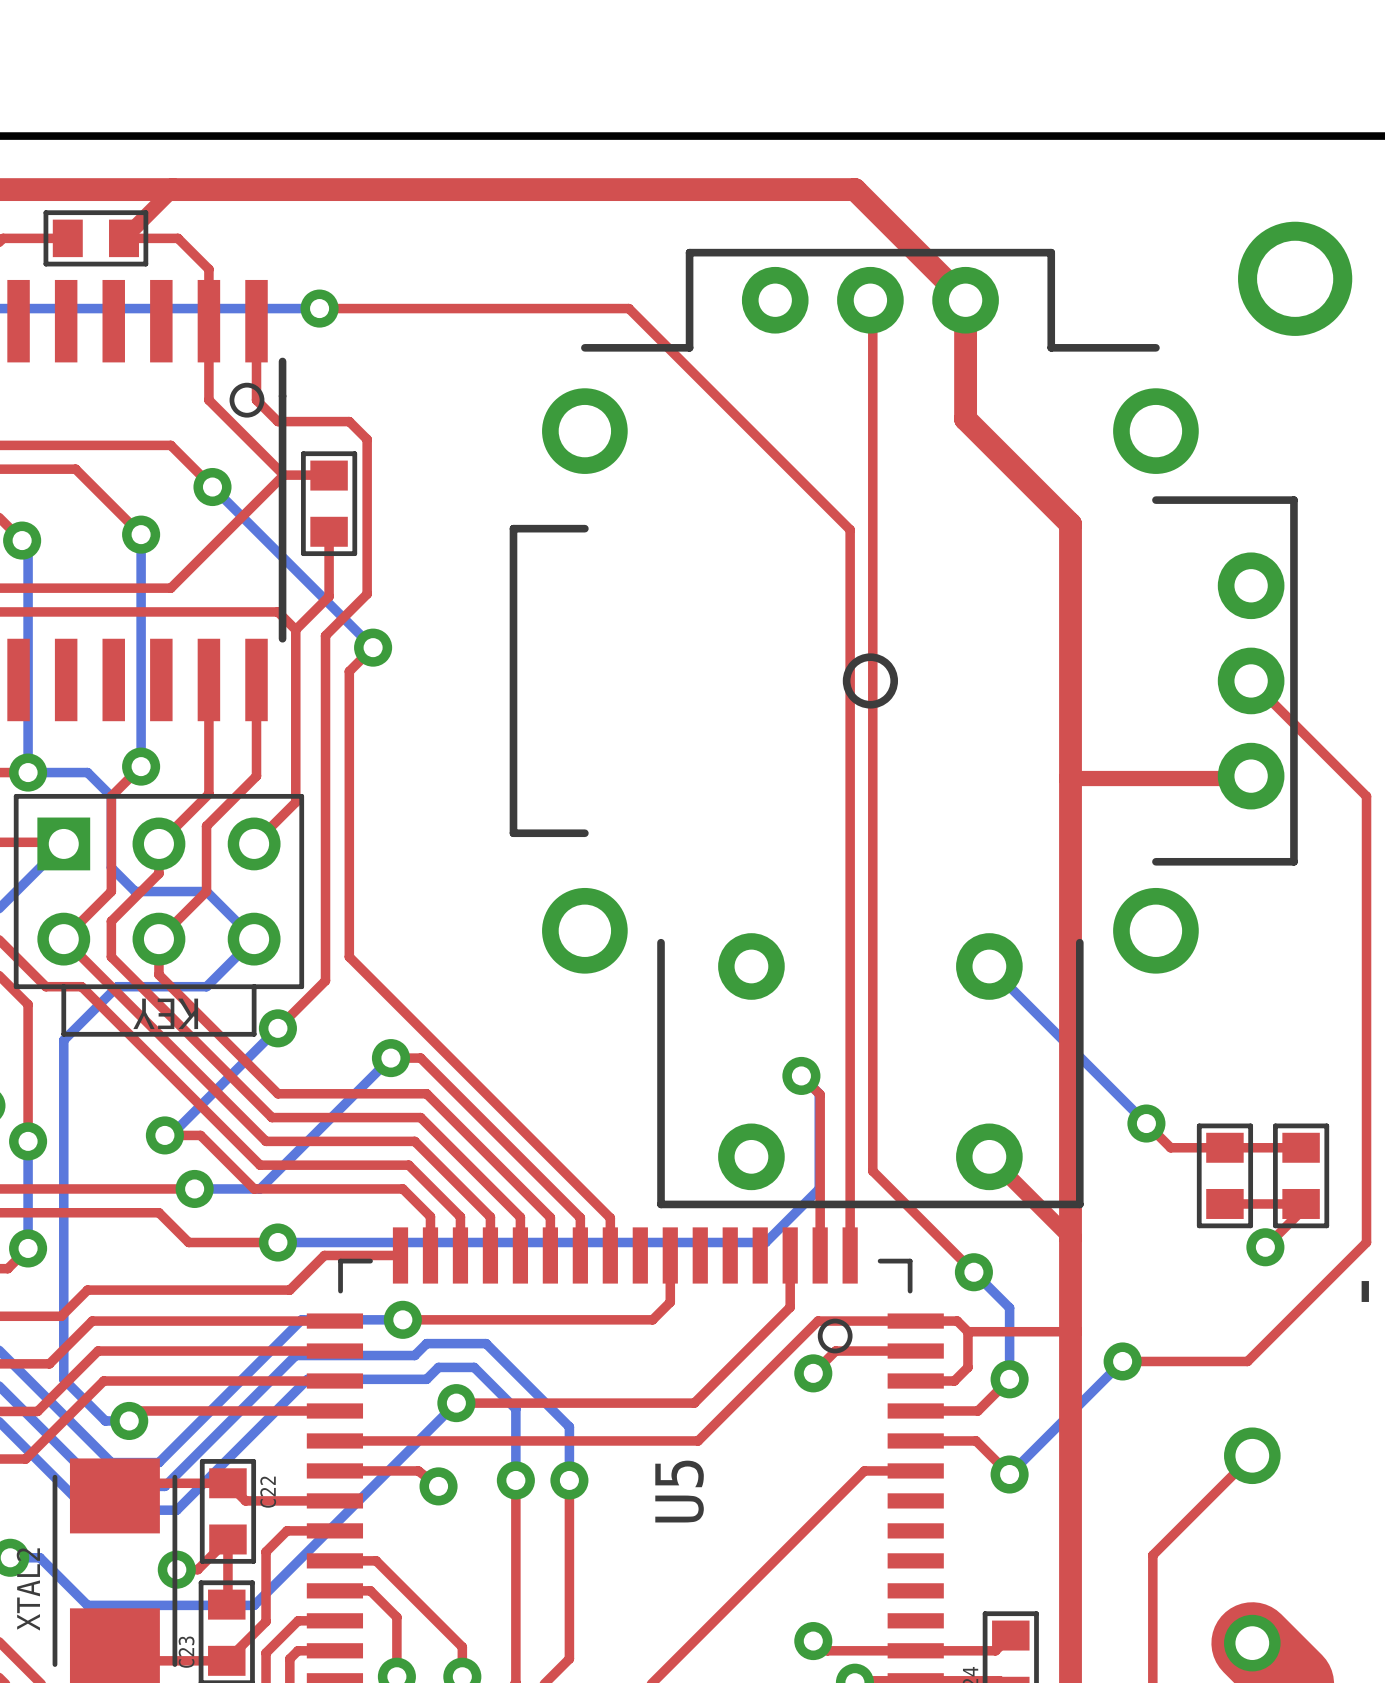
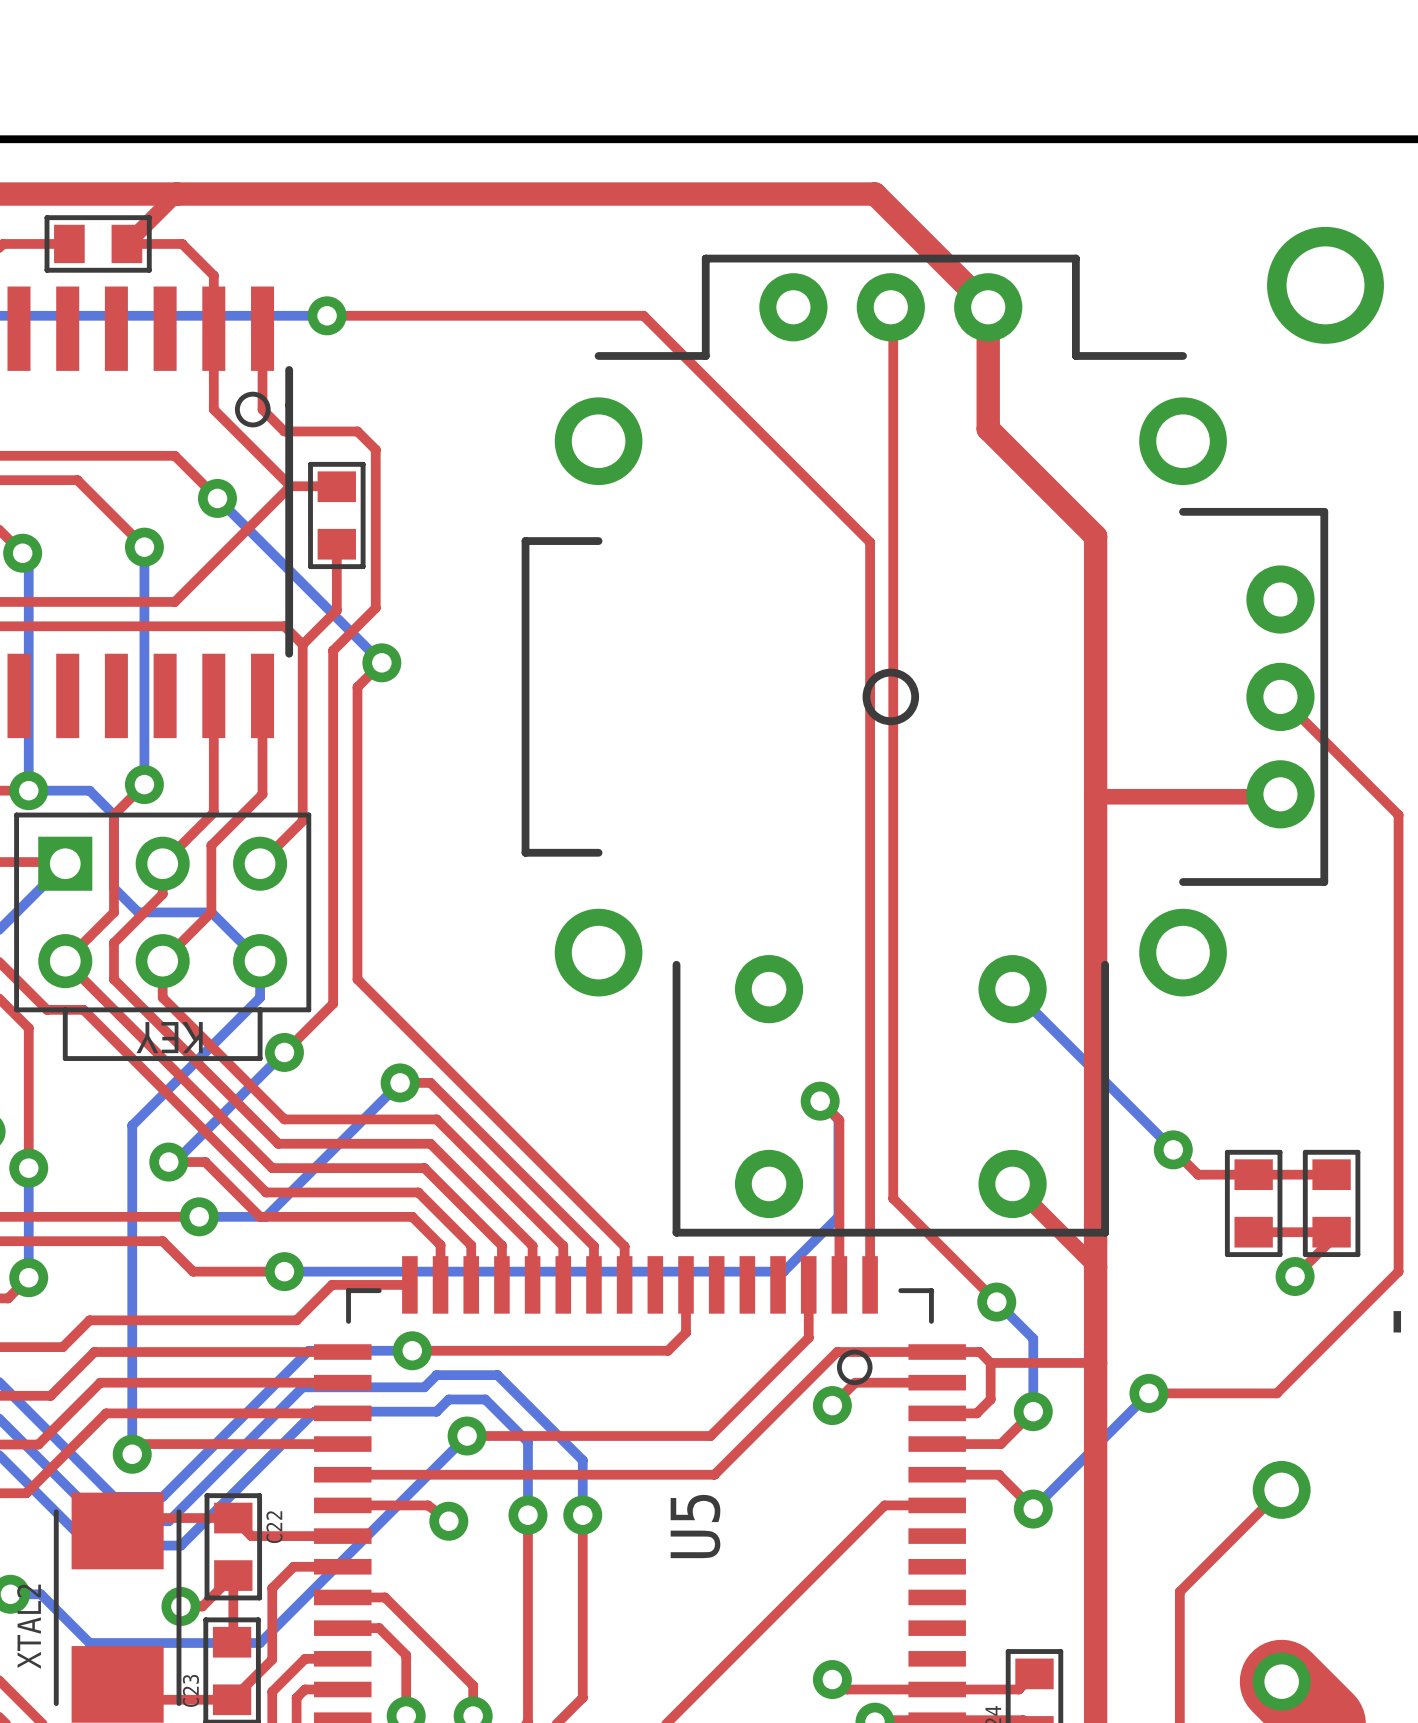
bottom track: (254, 939) (206, 986) (117, 986) (63, 1040) (63, 1379) (105, 1420) (129, 1420) -> (260, 961) (260, 997) (132, 1125) (132, 1454)

